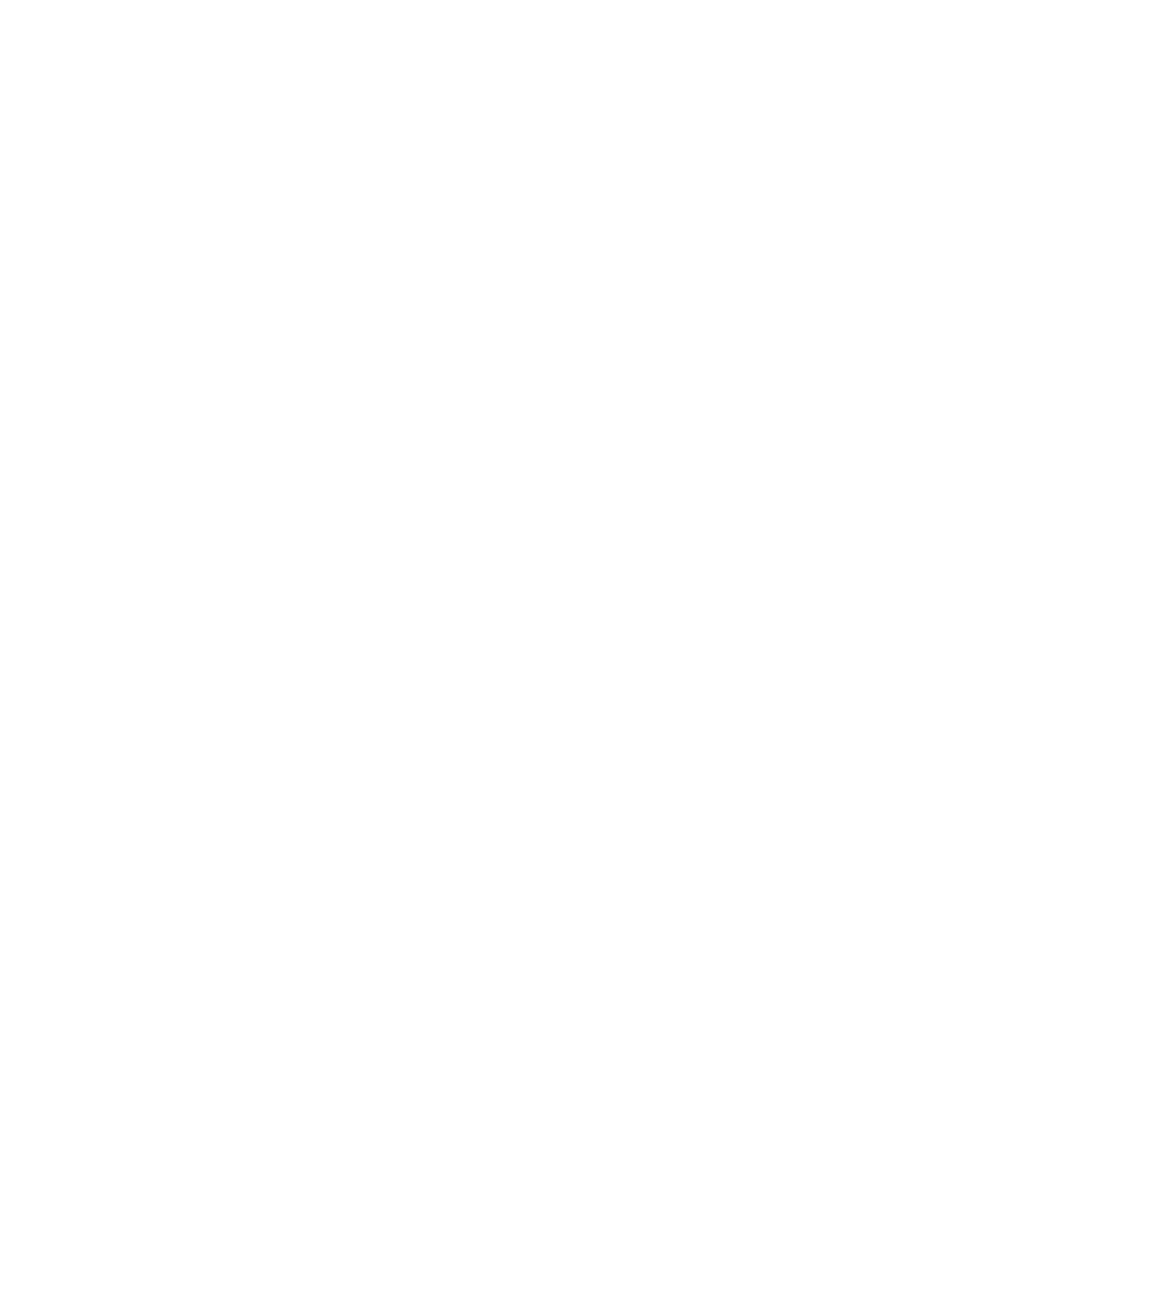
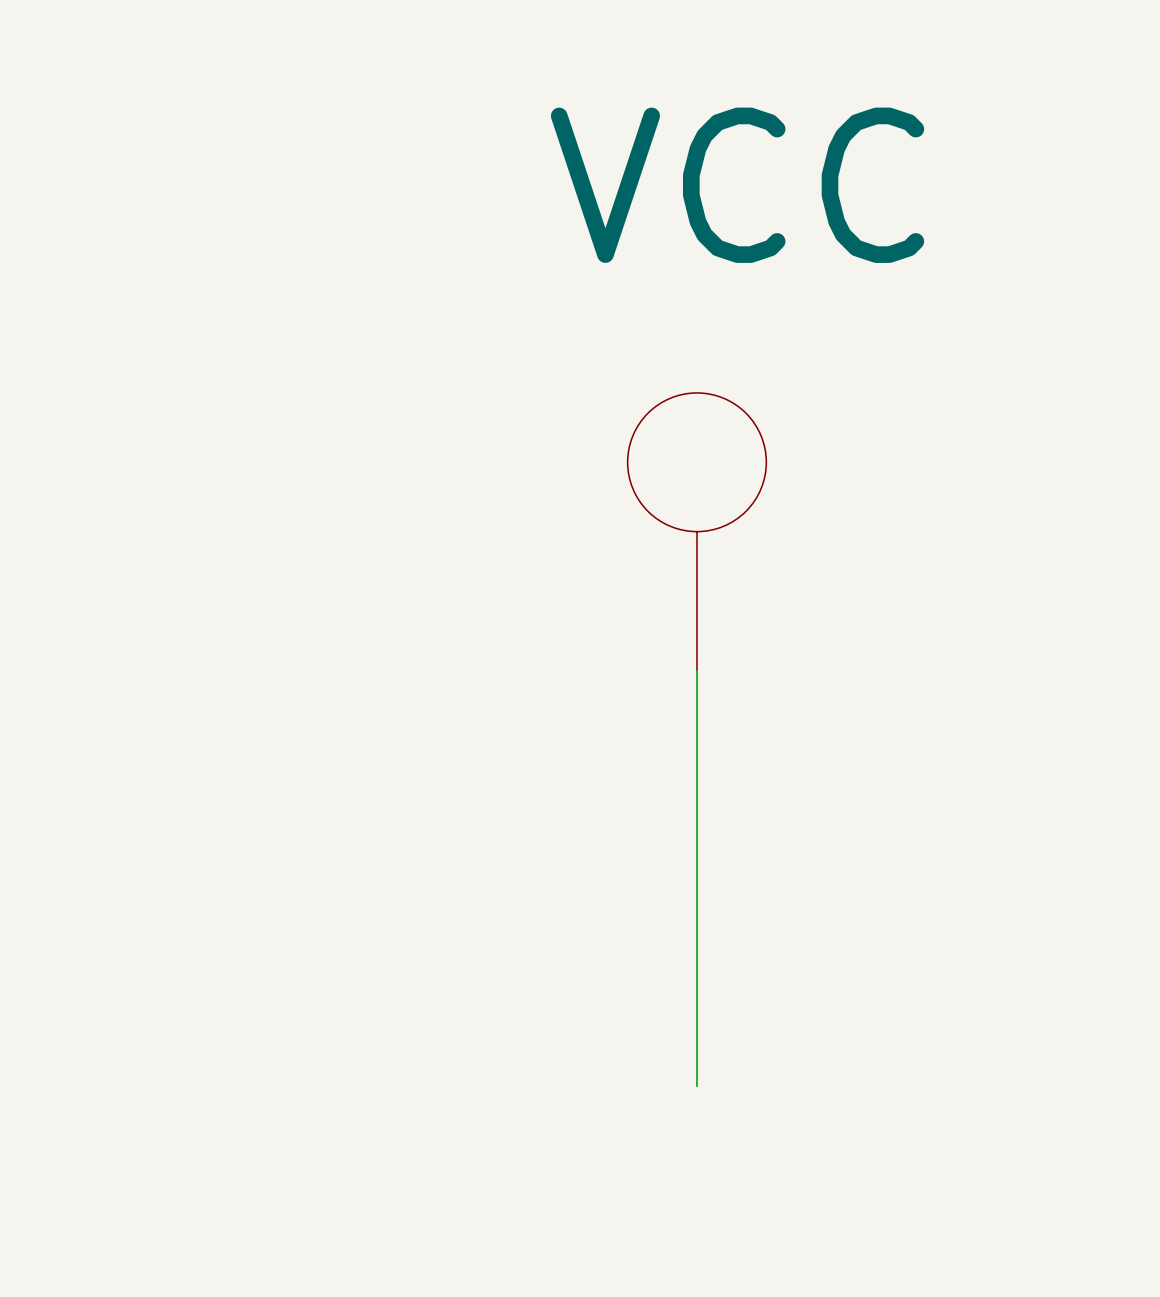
power symbol: none -> VCC (696, 531)
wire: none -> (696, 670) (696, 1086)

